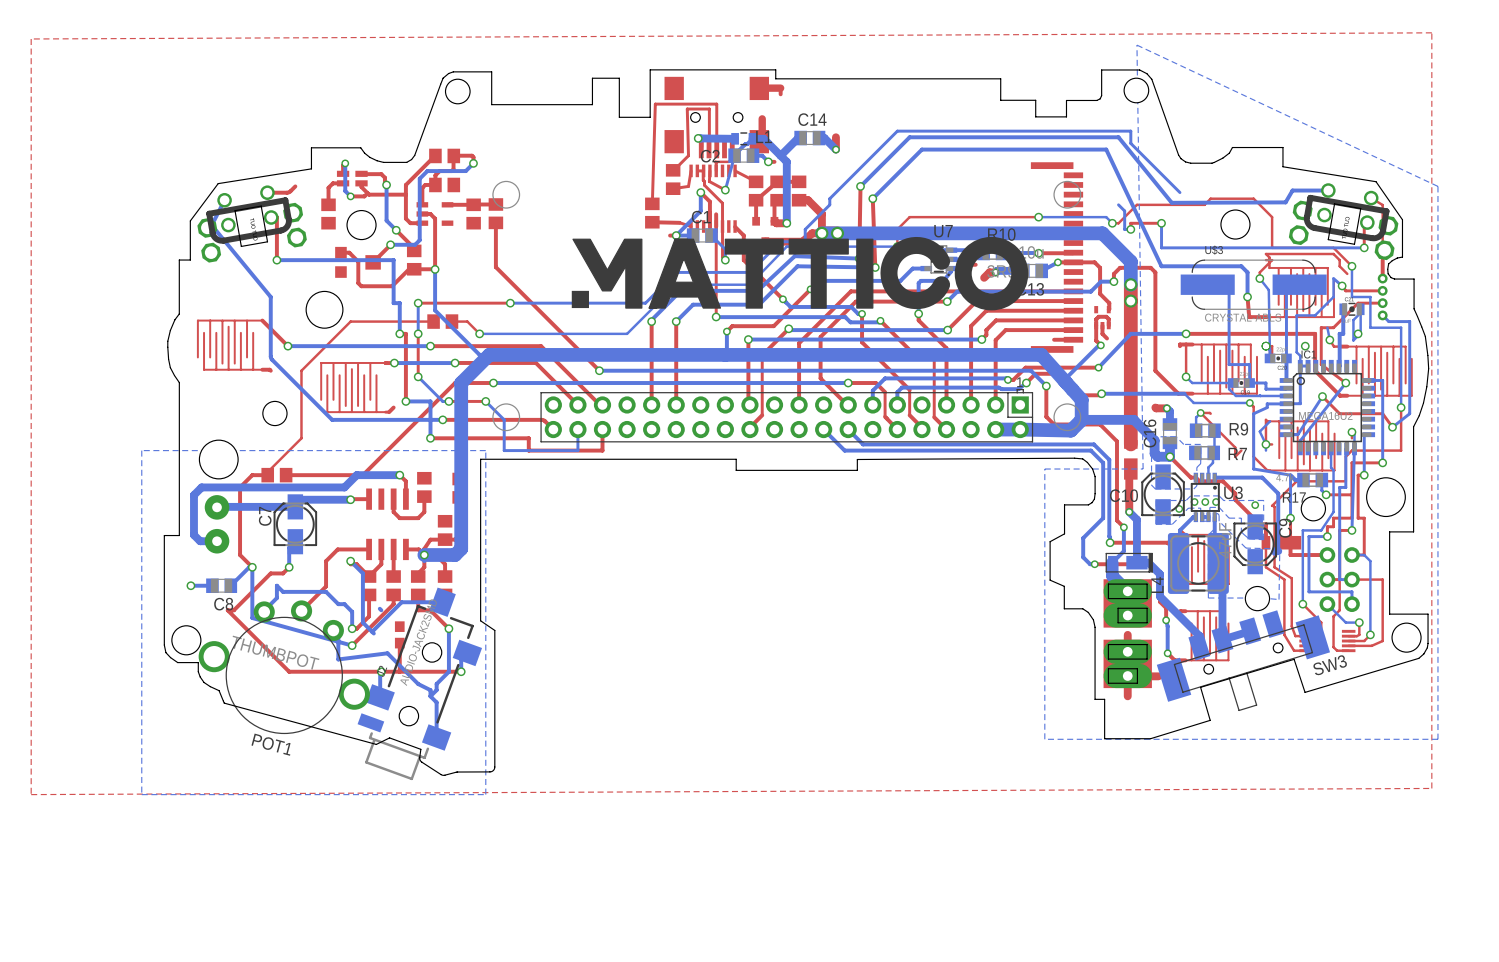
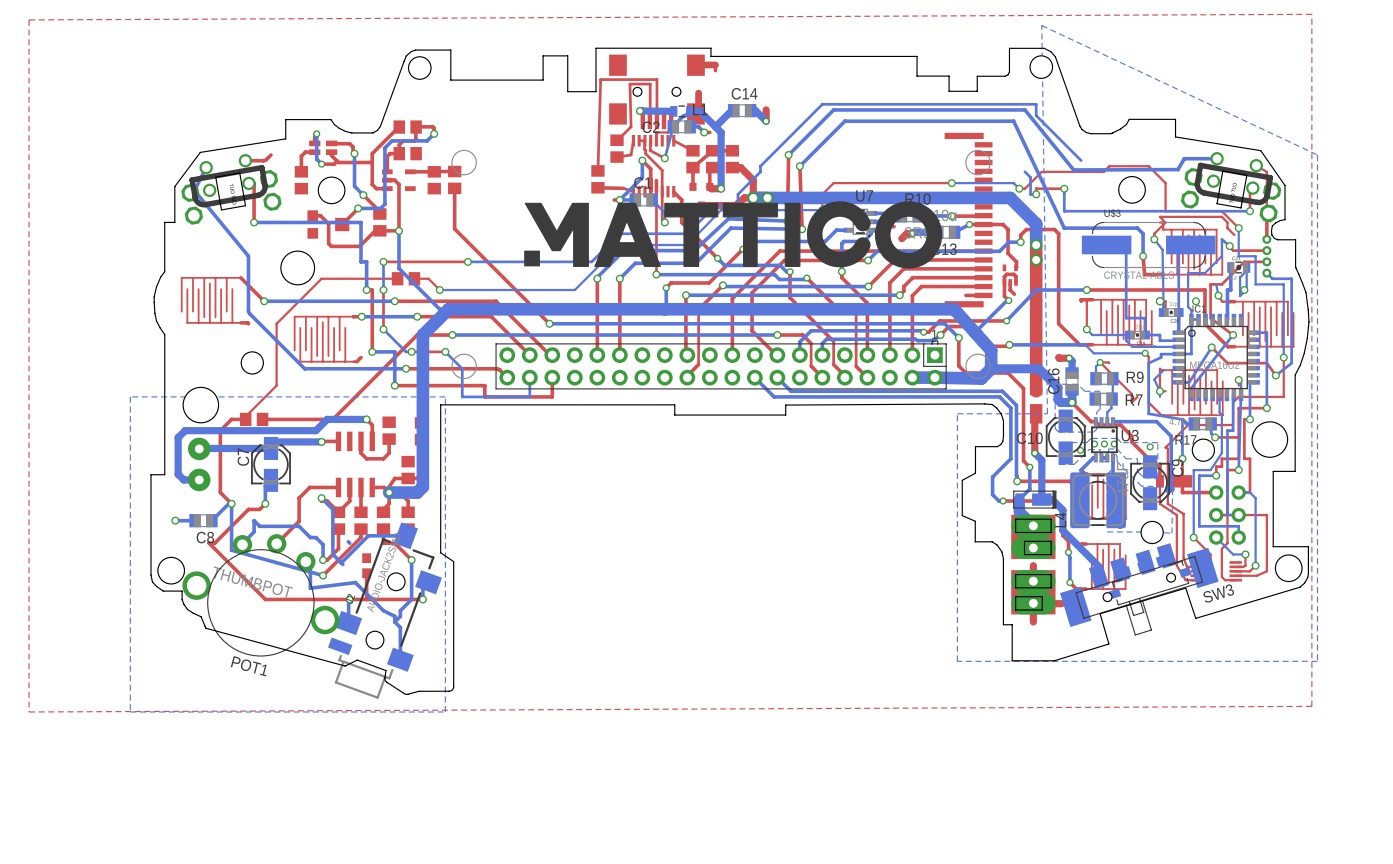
bottom track: (1222, 590) (1222, 639) (1250, 631) -> none
part: none -> (1150, 585)

